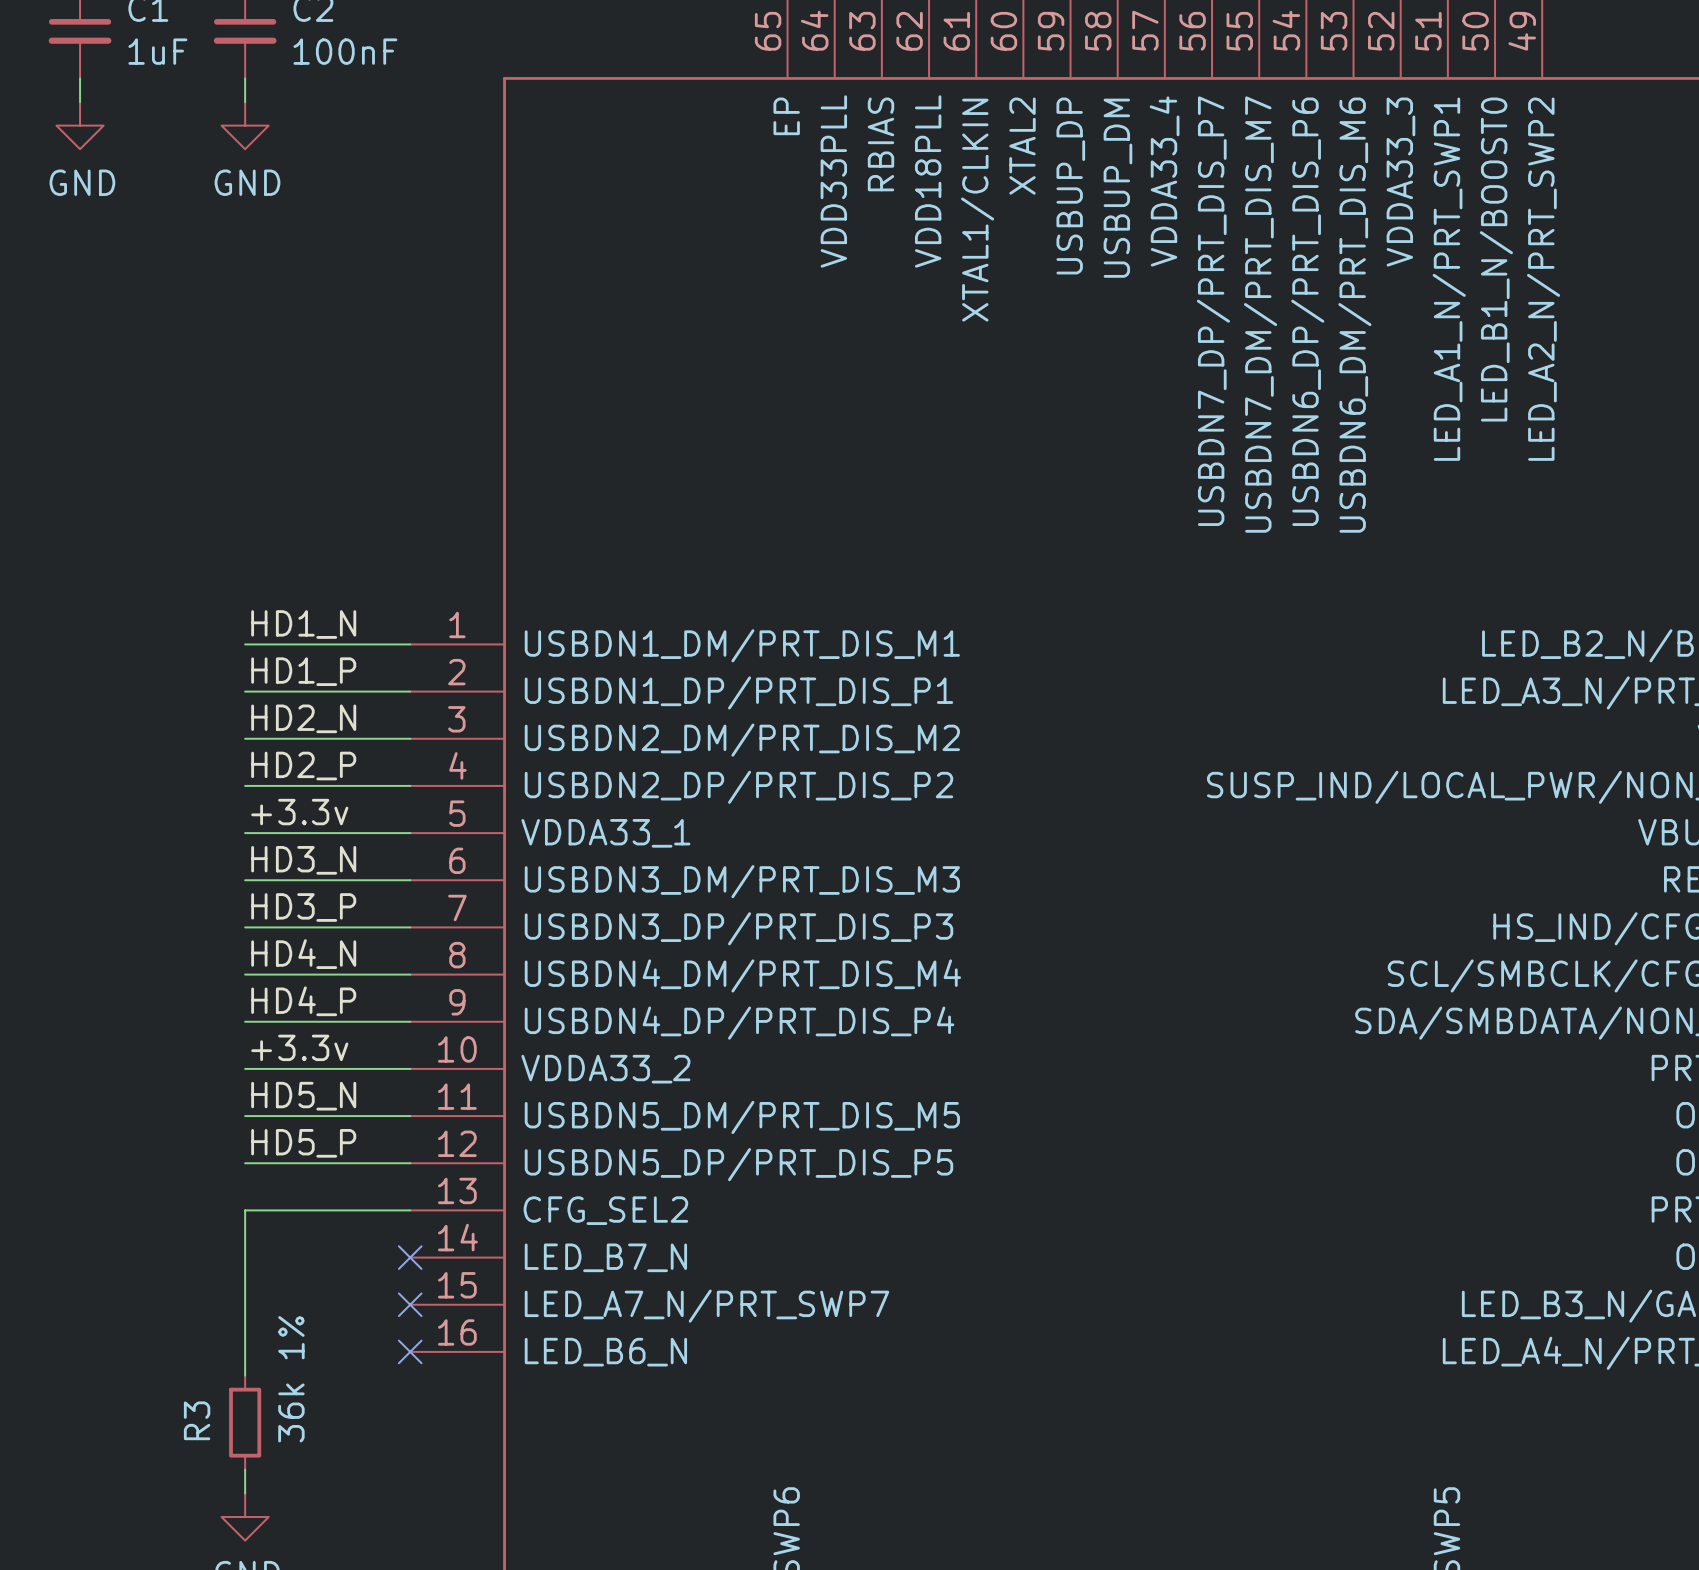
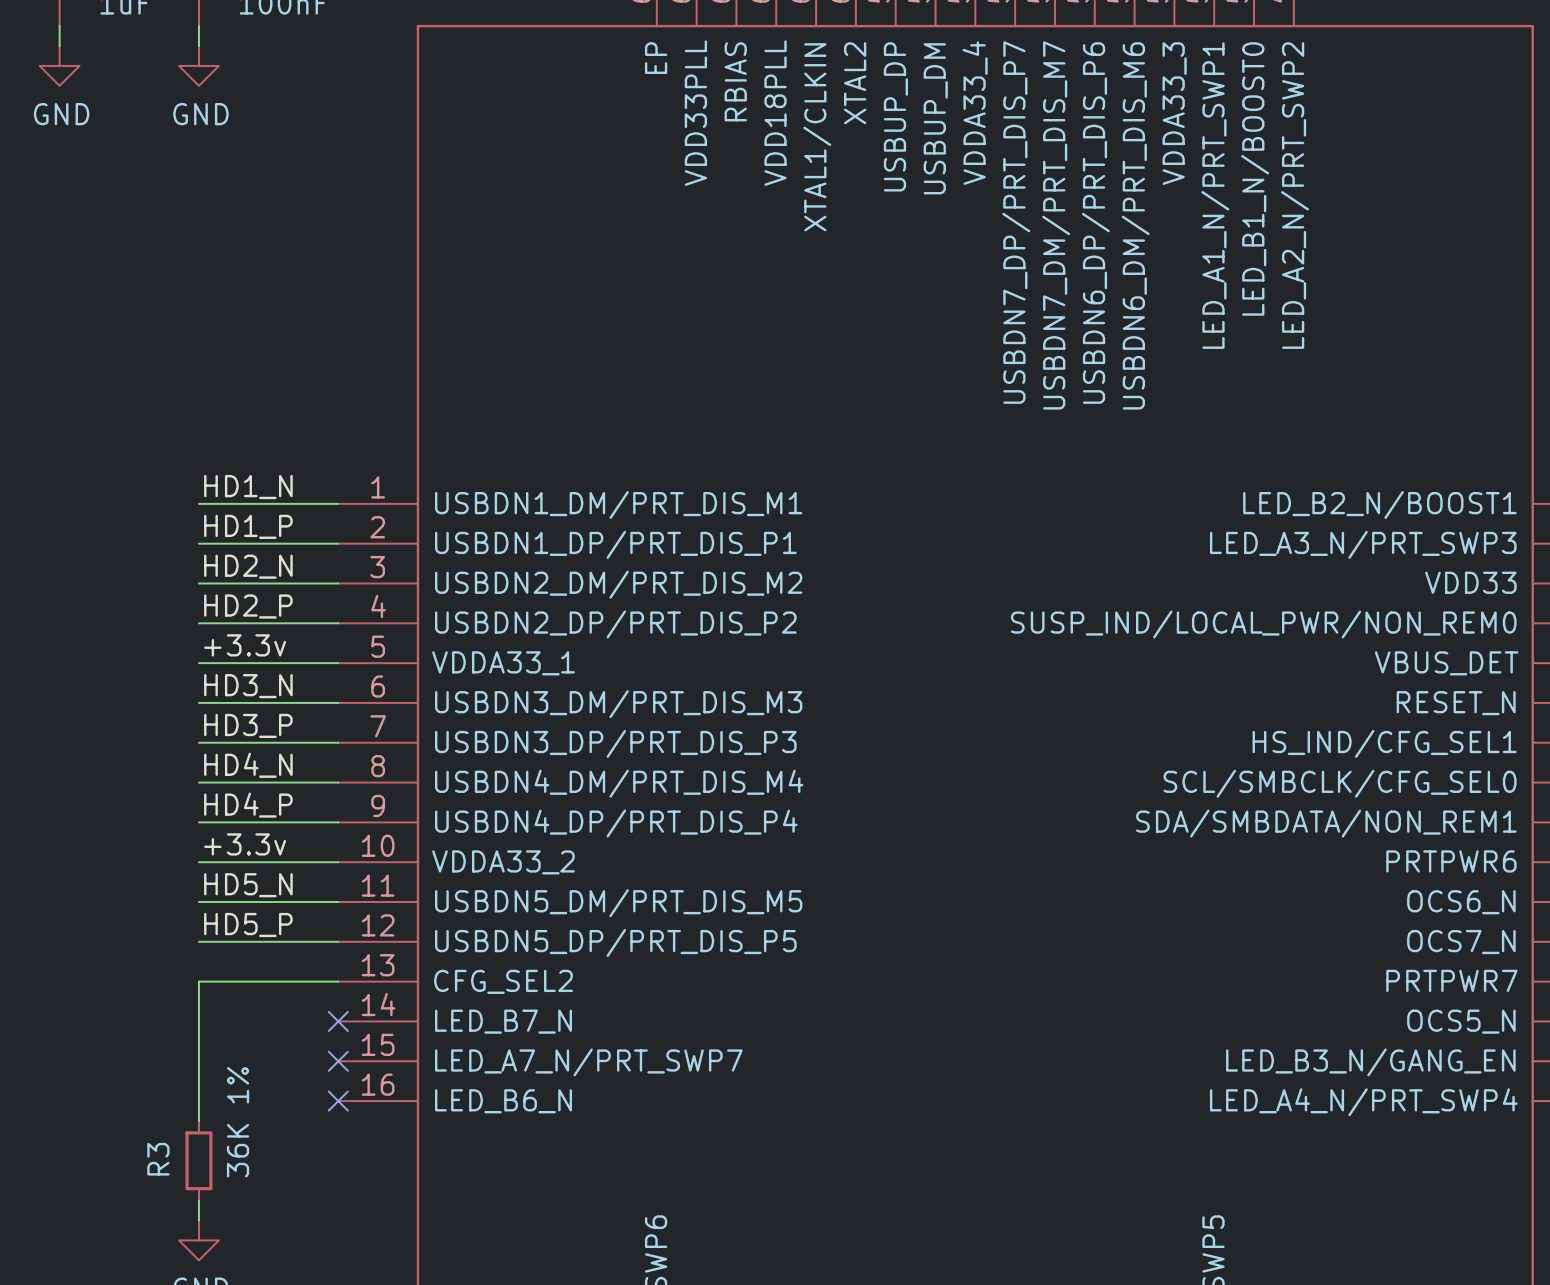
R3 value: 36k 1% (291, 1379) -> 36K 1% (238, 1122)

